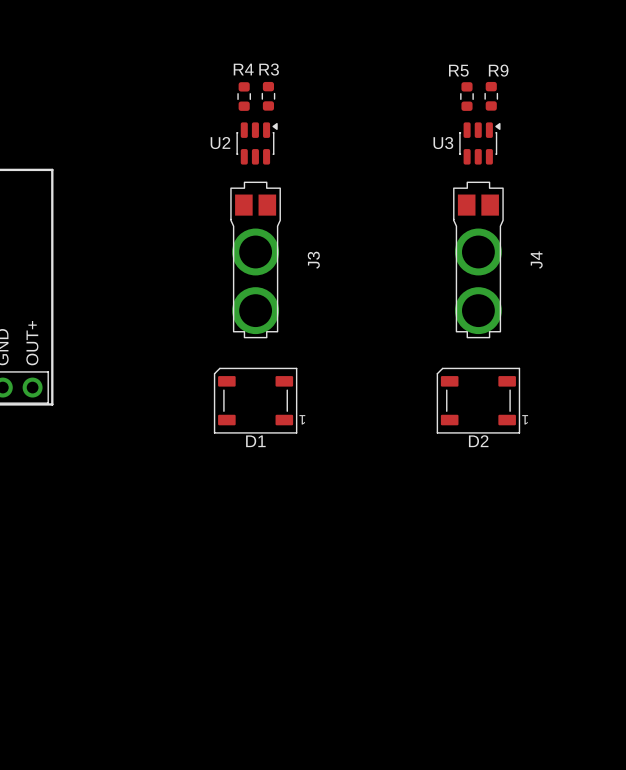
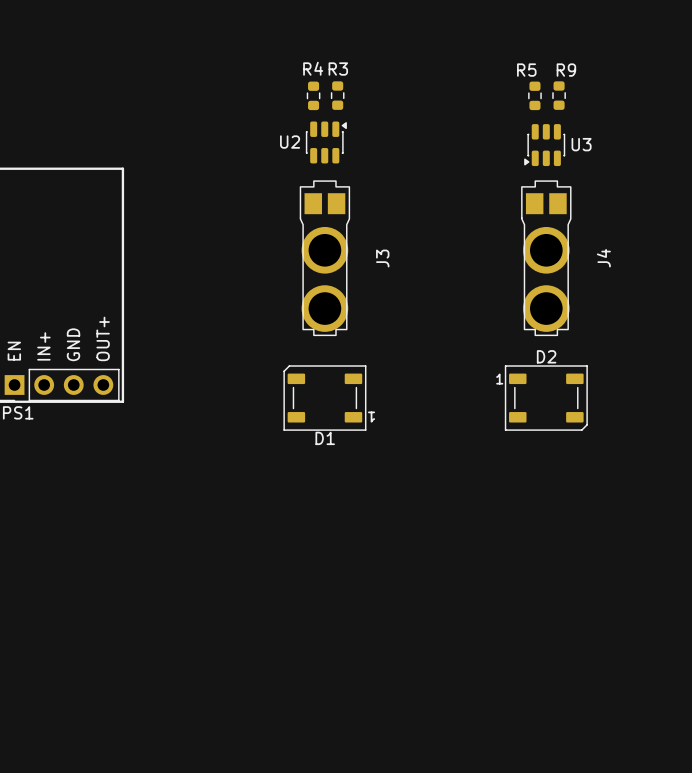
U3 rotation: 0° (479, 143) -> 180° (544, 145)
D2 rotation: 0° (478, 400) -> 180° (546, 398)

